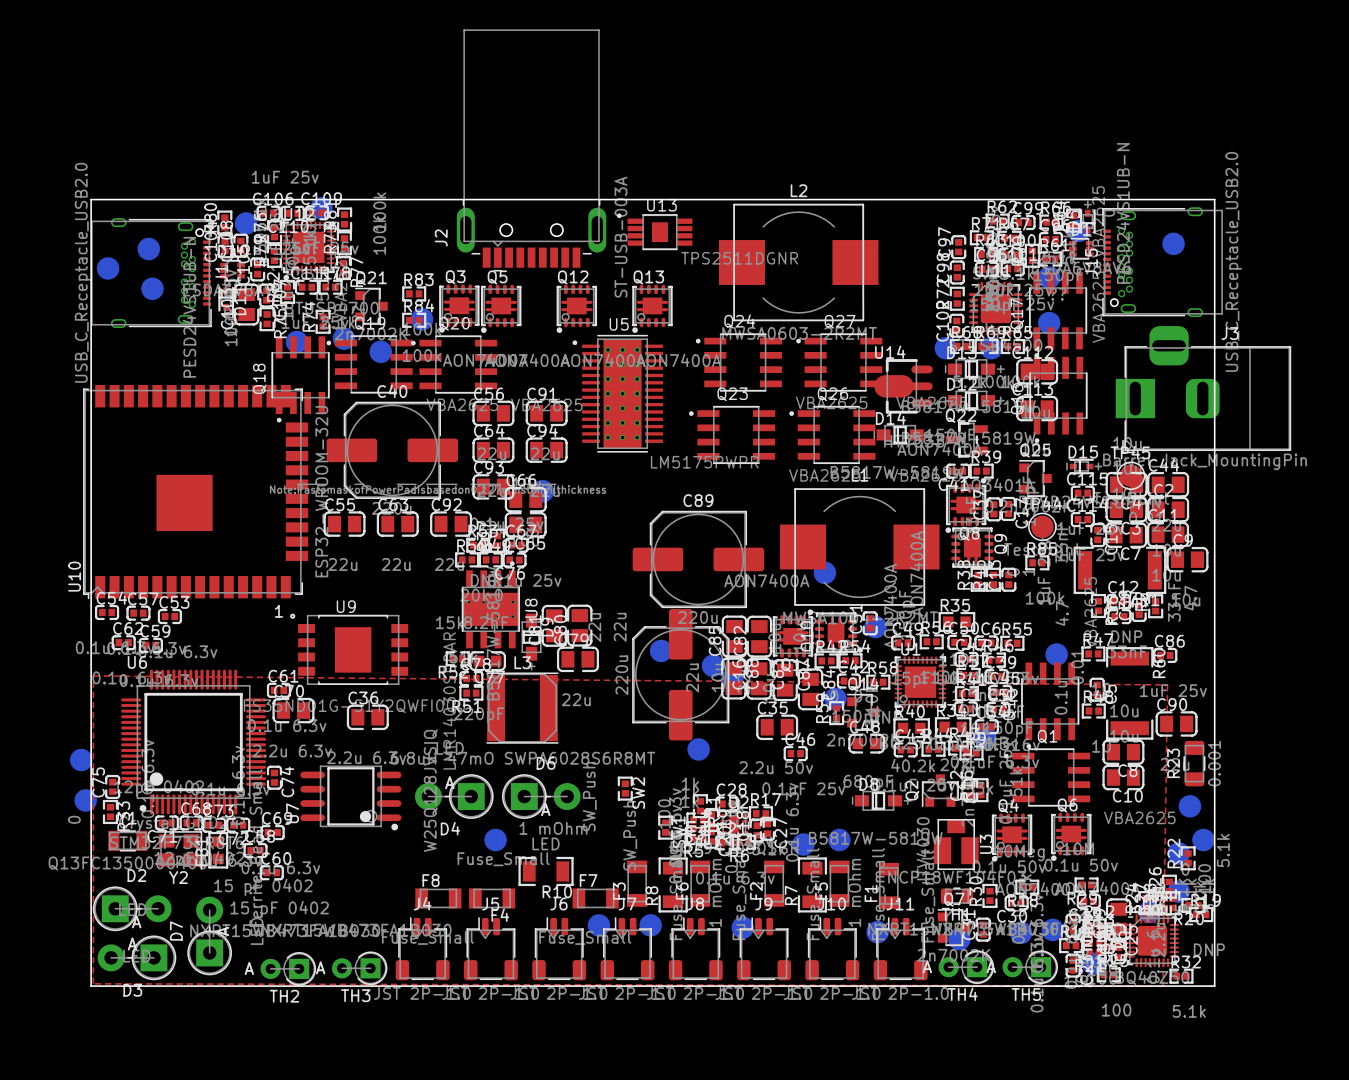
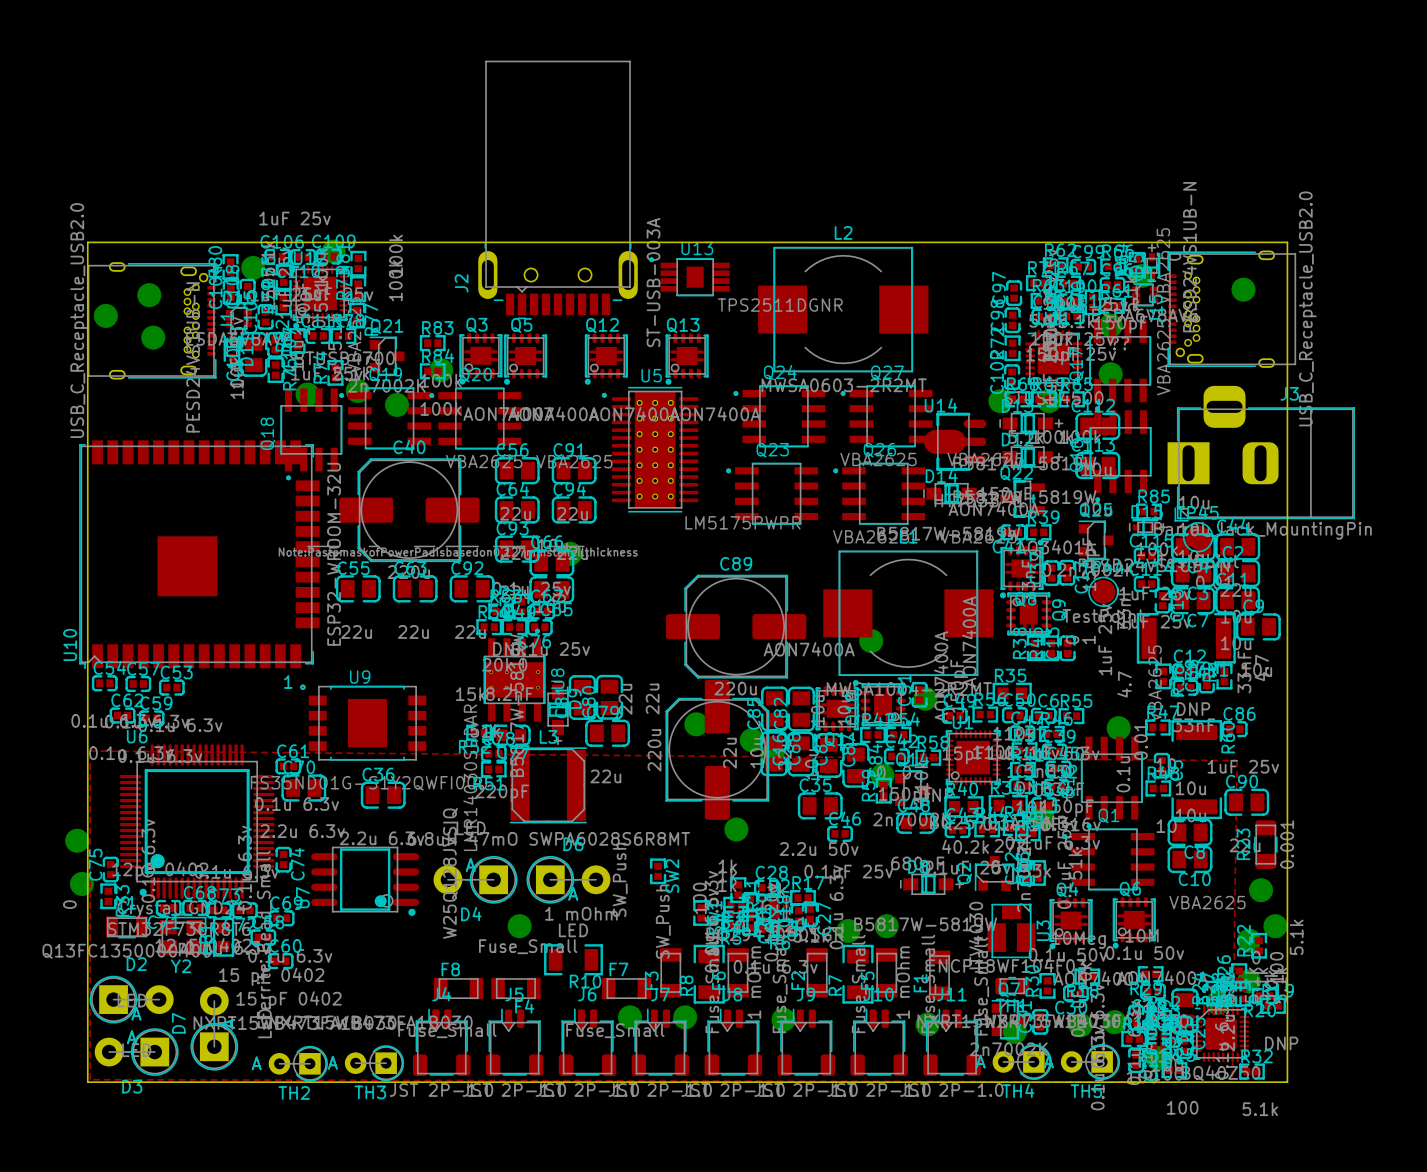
J3 position: (1203, 389) -> (1261, 453)
R85 position: (1037, 562) -> (1149, 511)

